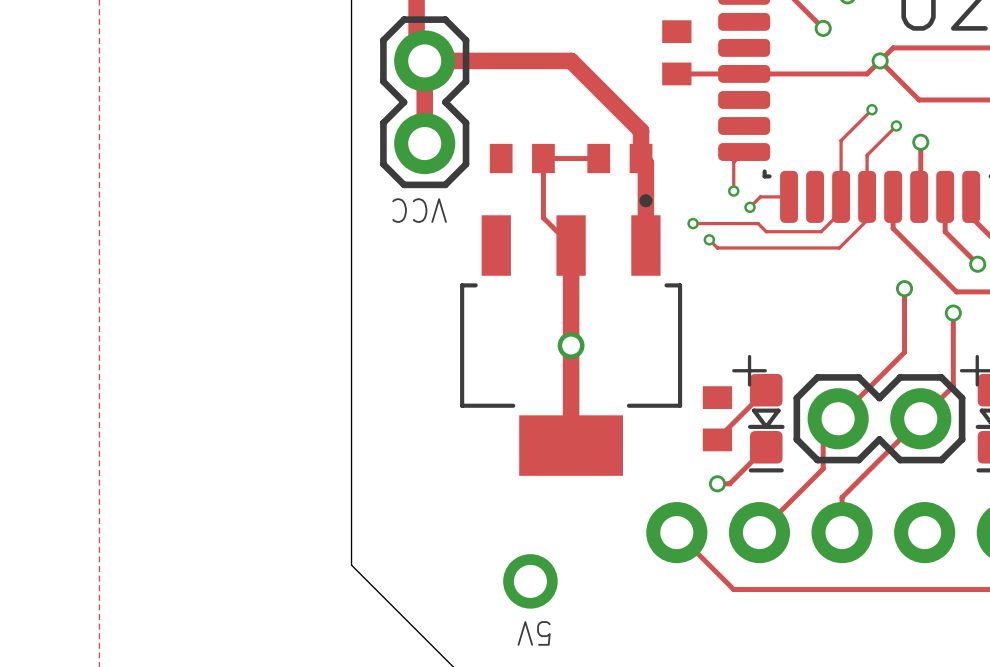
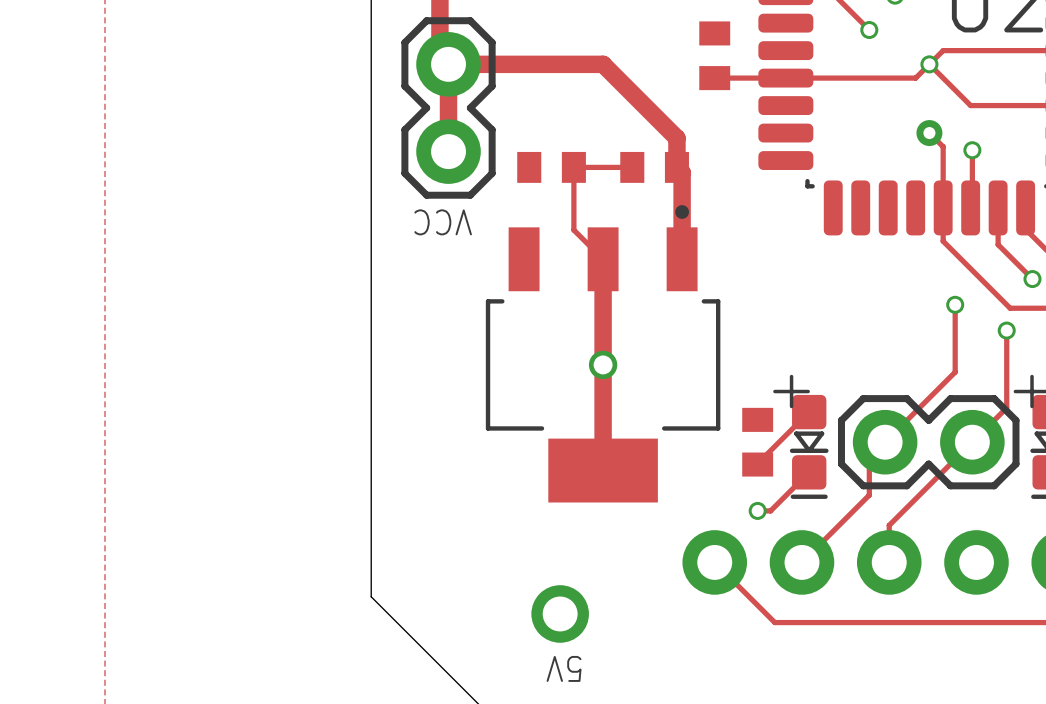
track: (871, 109) (841, 140) (841, 211) (821, 231) (766, 231) (758, 223) (693, 223) -> none
via: (871, 109) -> none
track: none -> (929, 133) (943, 146) (943, 207)
via: none -> (929, 133)
track: (896, 125) (867, 155) (867, 220) (839, 247) (717, 247) (709, 239) -> none
via: (896, 125) -> none
track: (744, 152) (733, 162) (733, 191) -> none
via: (733, 191) -> none
track: (789, 196) (760, 196) (750, 207) -> none
via: (750, 207) -> none
via: (693, 223) -> none
via: (709, 239) -> none

